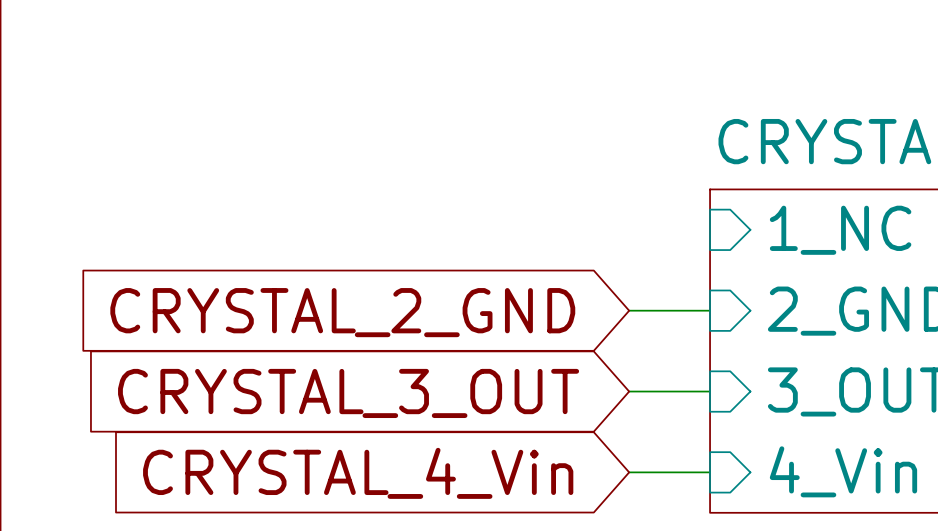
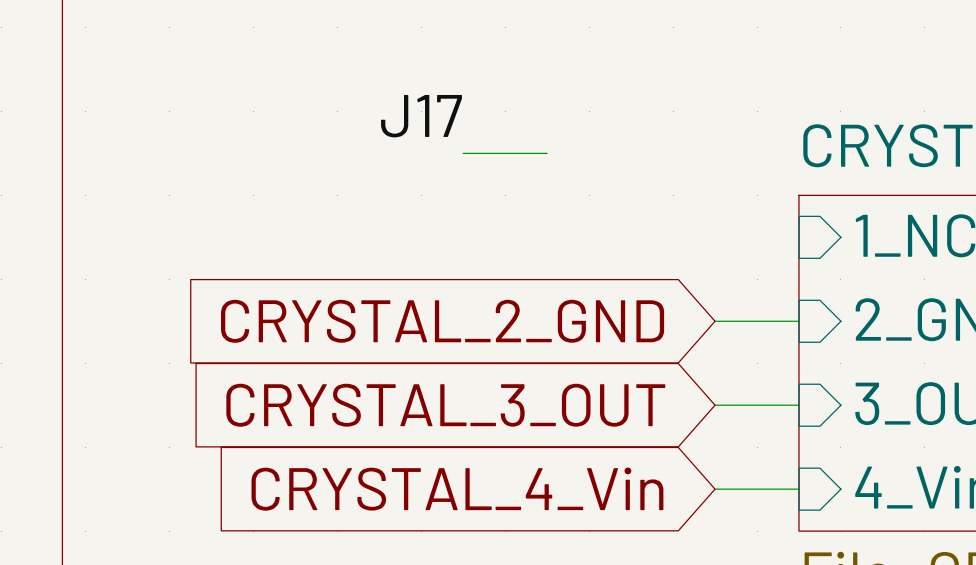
label: none -> J17 (421, 116)
wire: none -> (463, 153) (547, 153)

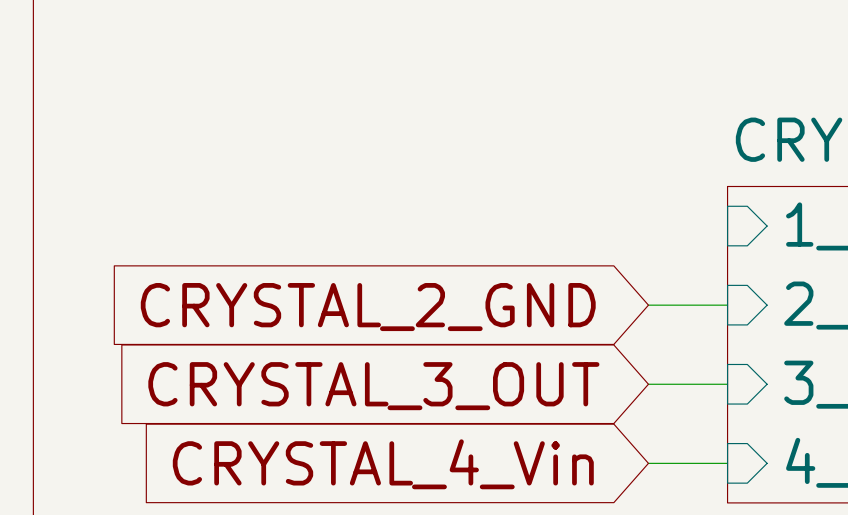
label: J17 (421, 116) -> none
wire: (463, 153) (547, 153) -> none

